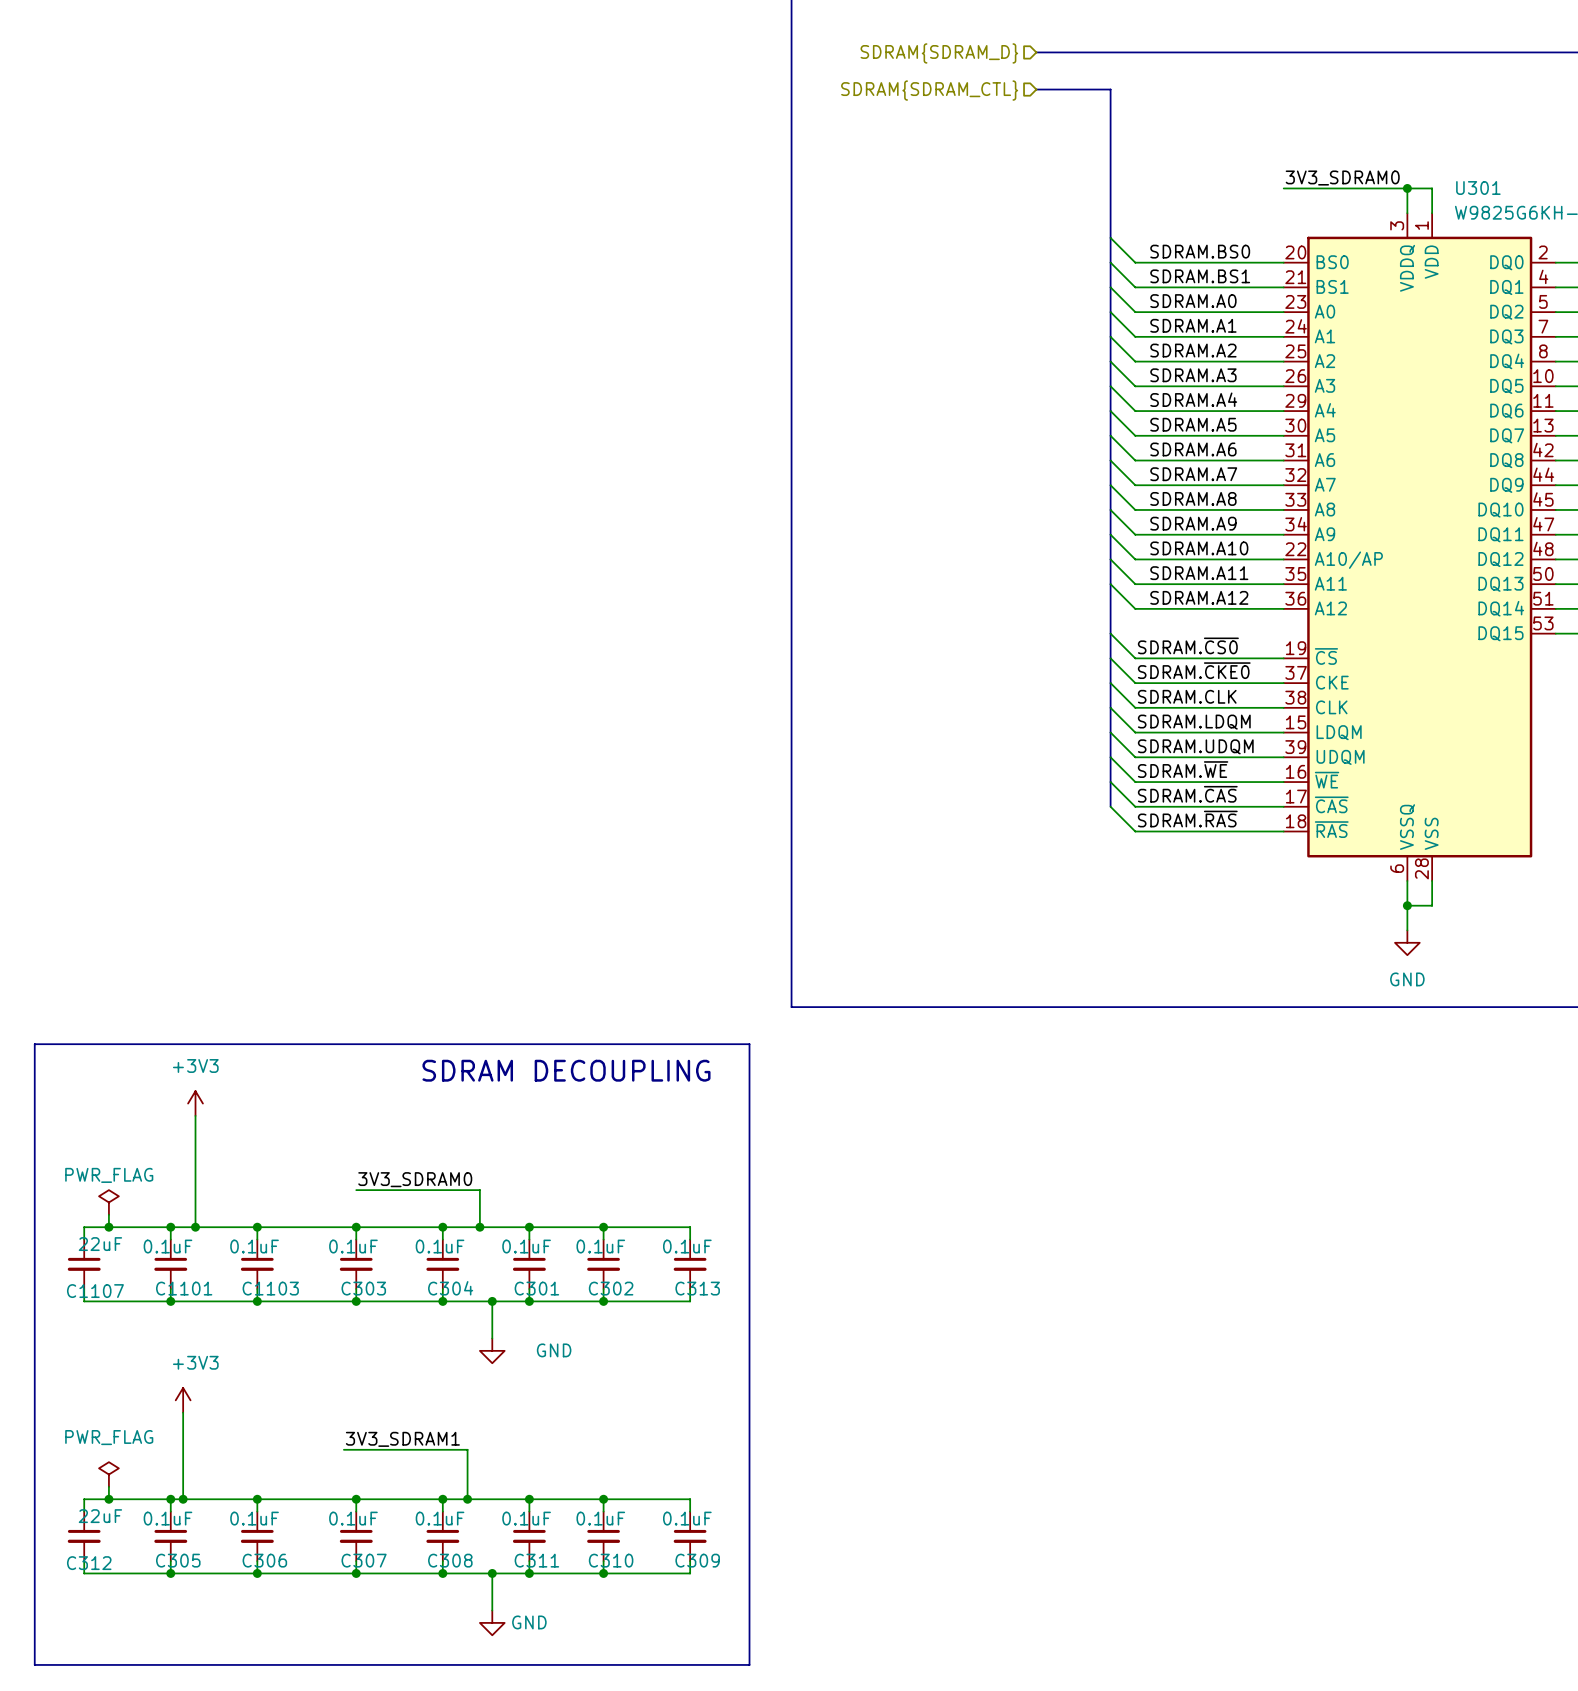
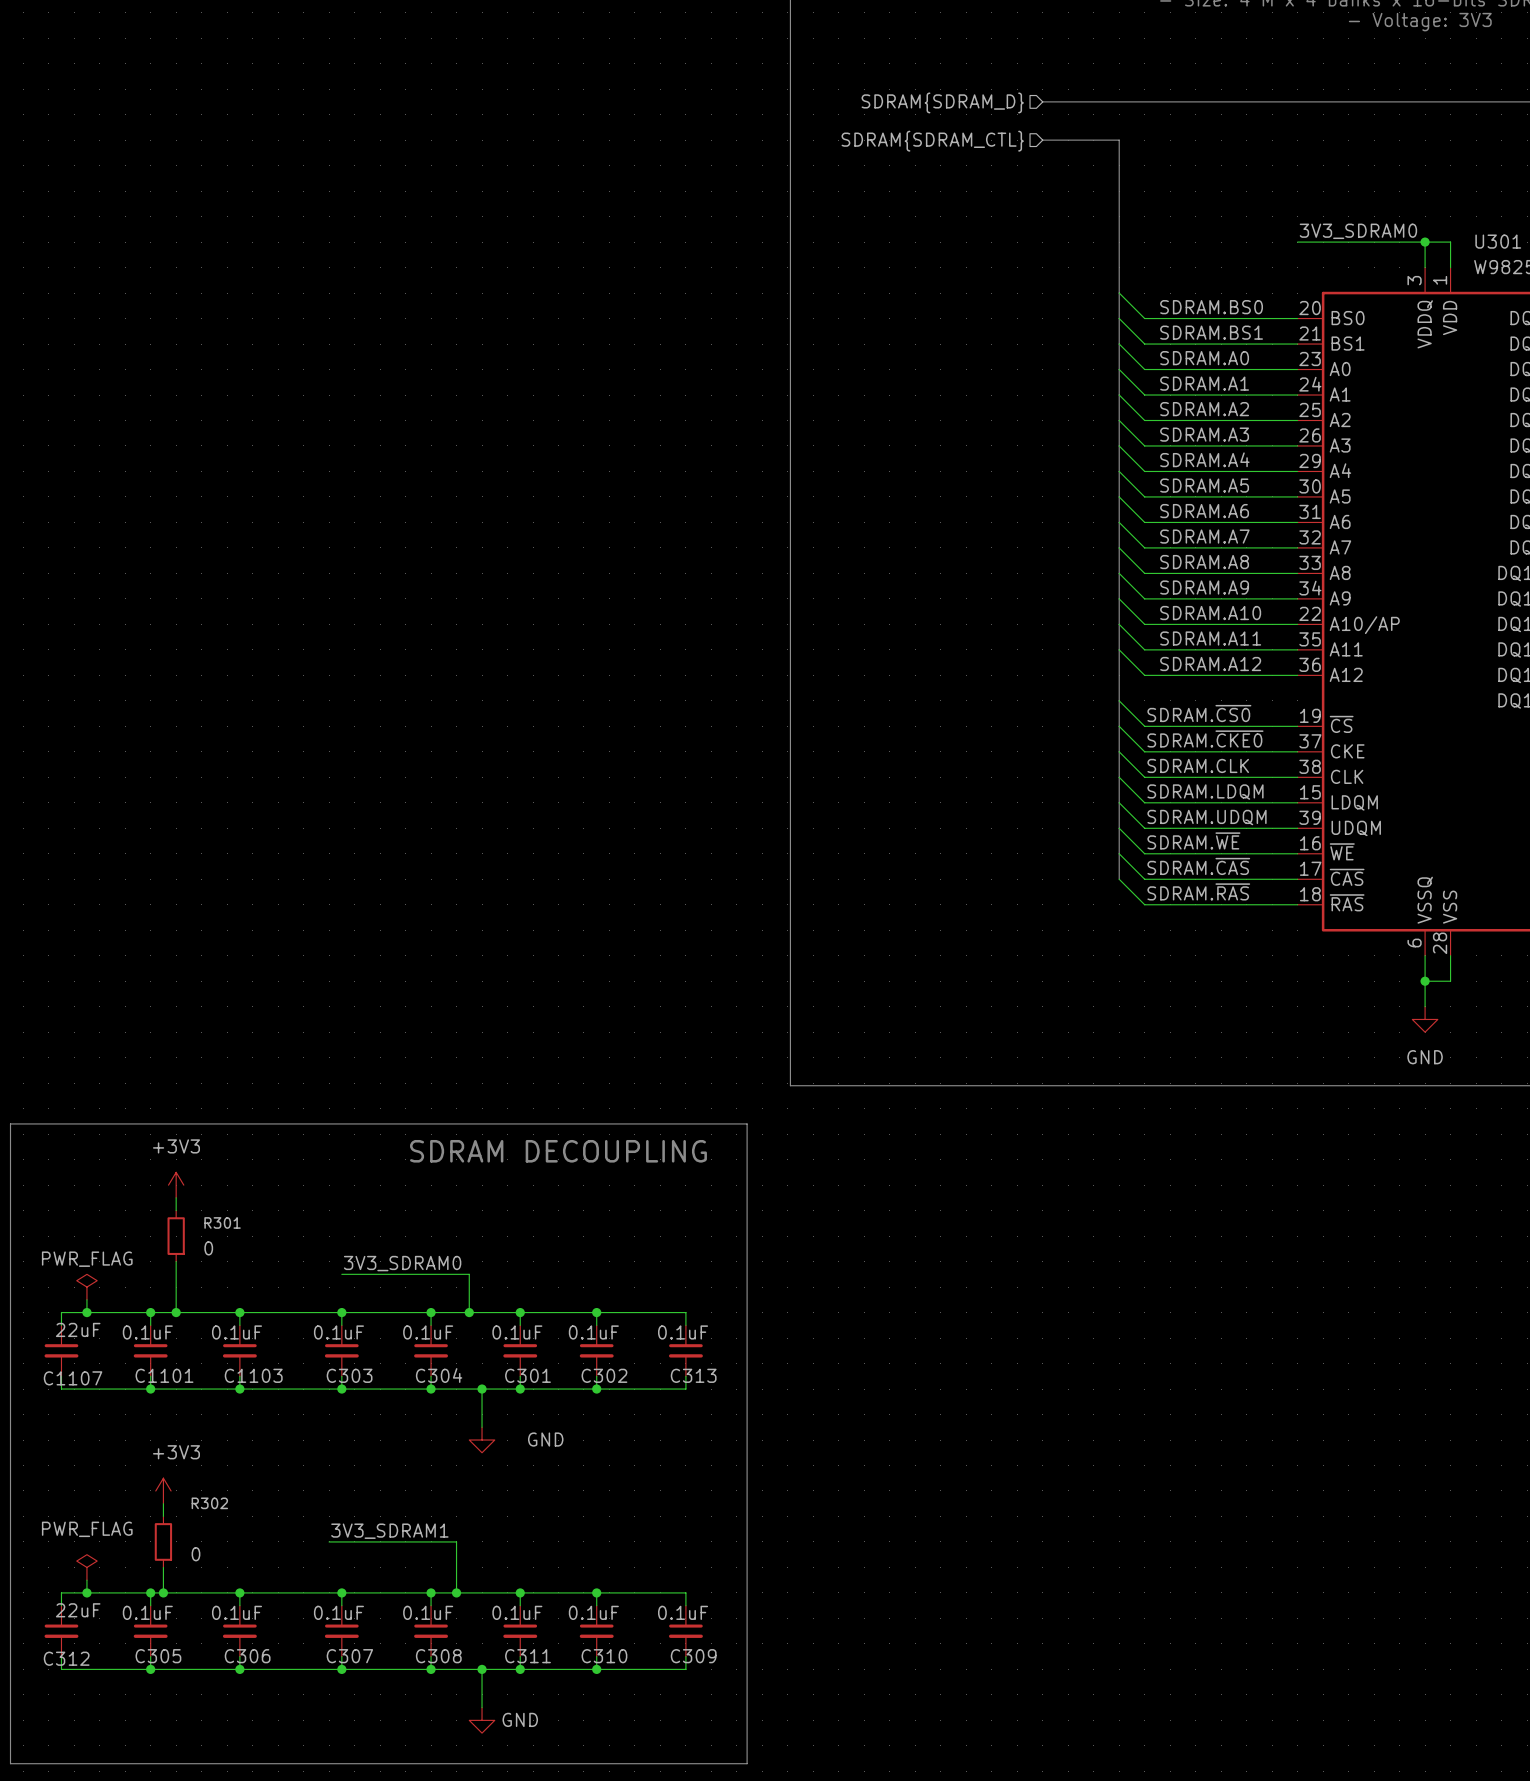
wire: (195, 1128) (195, 1177) -> none
R301: none -> 0 (176, 1236)
wire: (183, 1425) (183, 1474) -> none
R302: none -> 0 (163, 1541)

